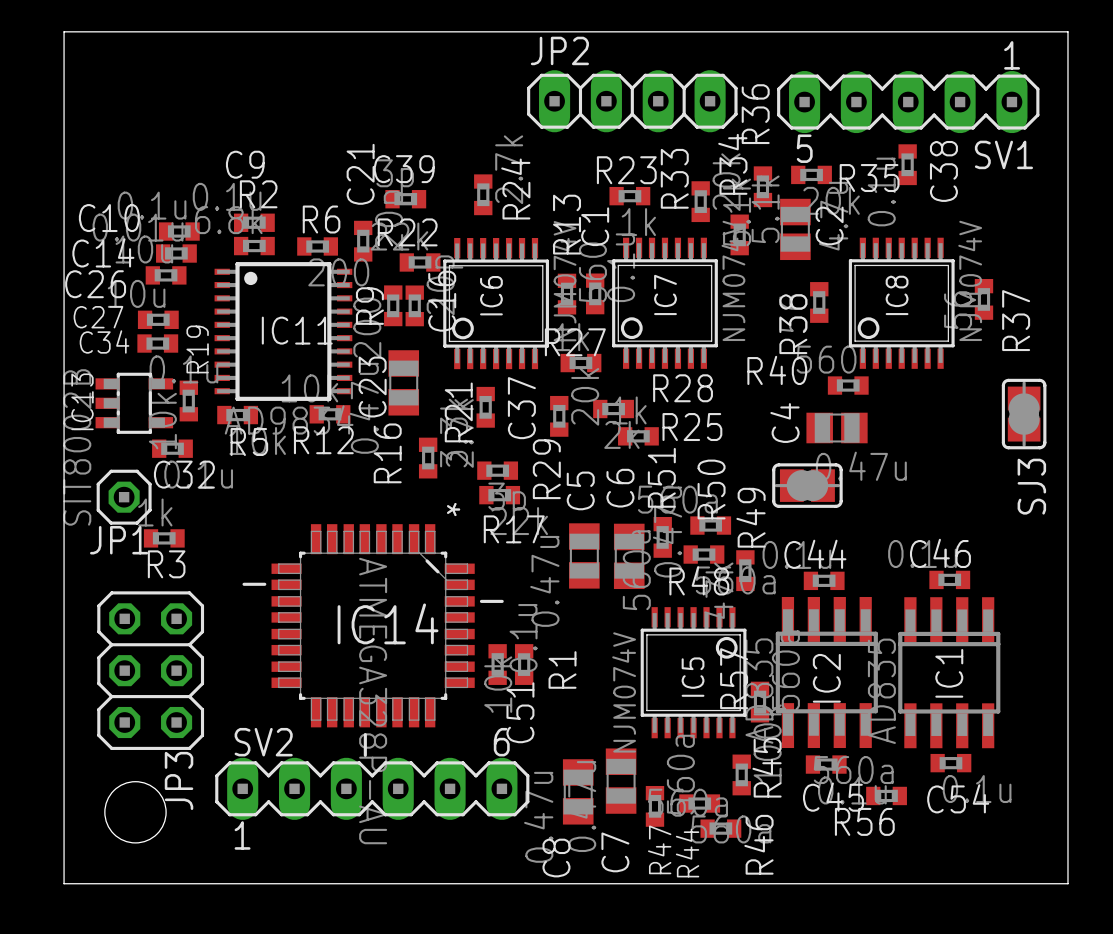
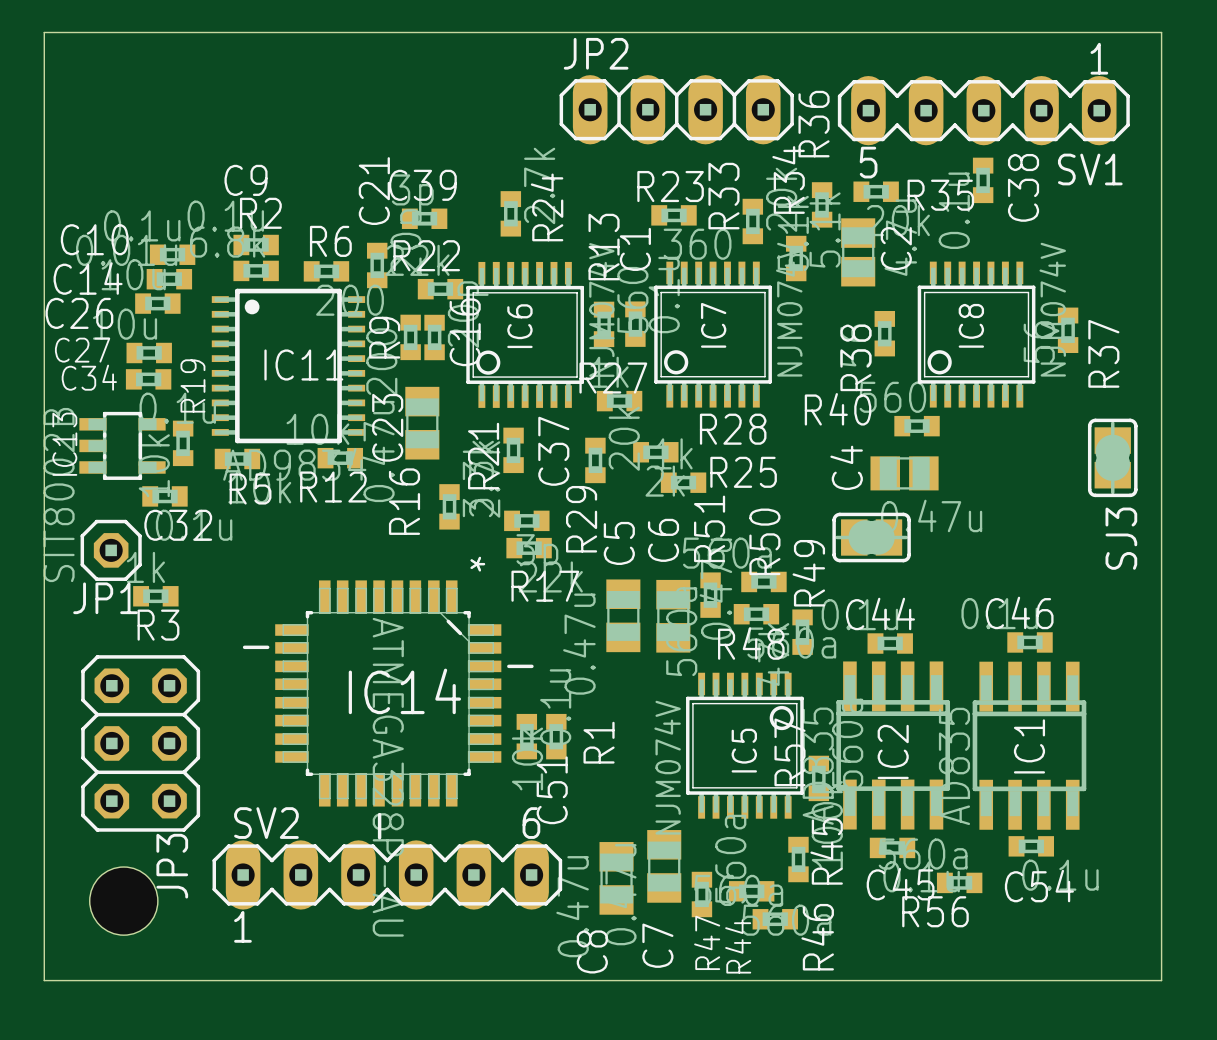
R23 value: 1k (638, 222) -> 360 (697, 244)

